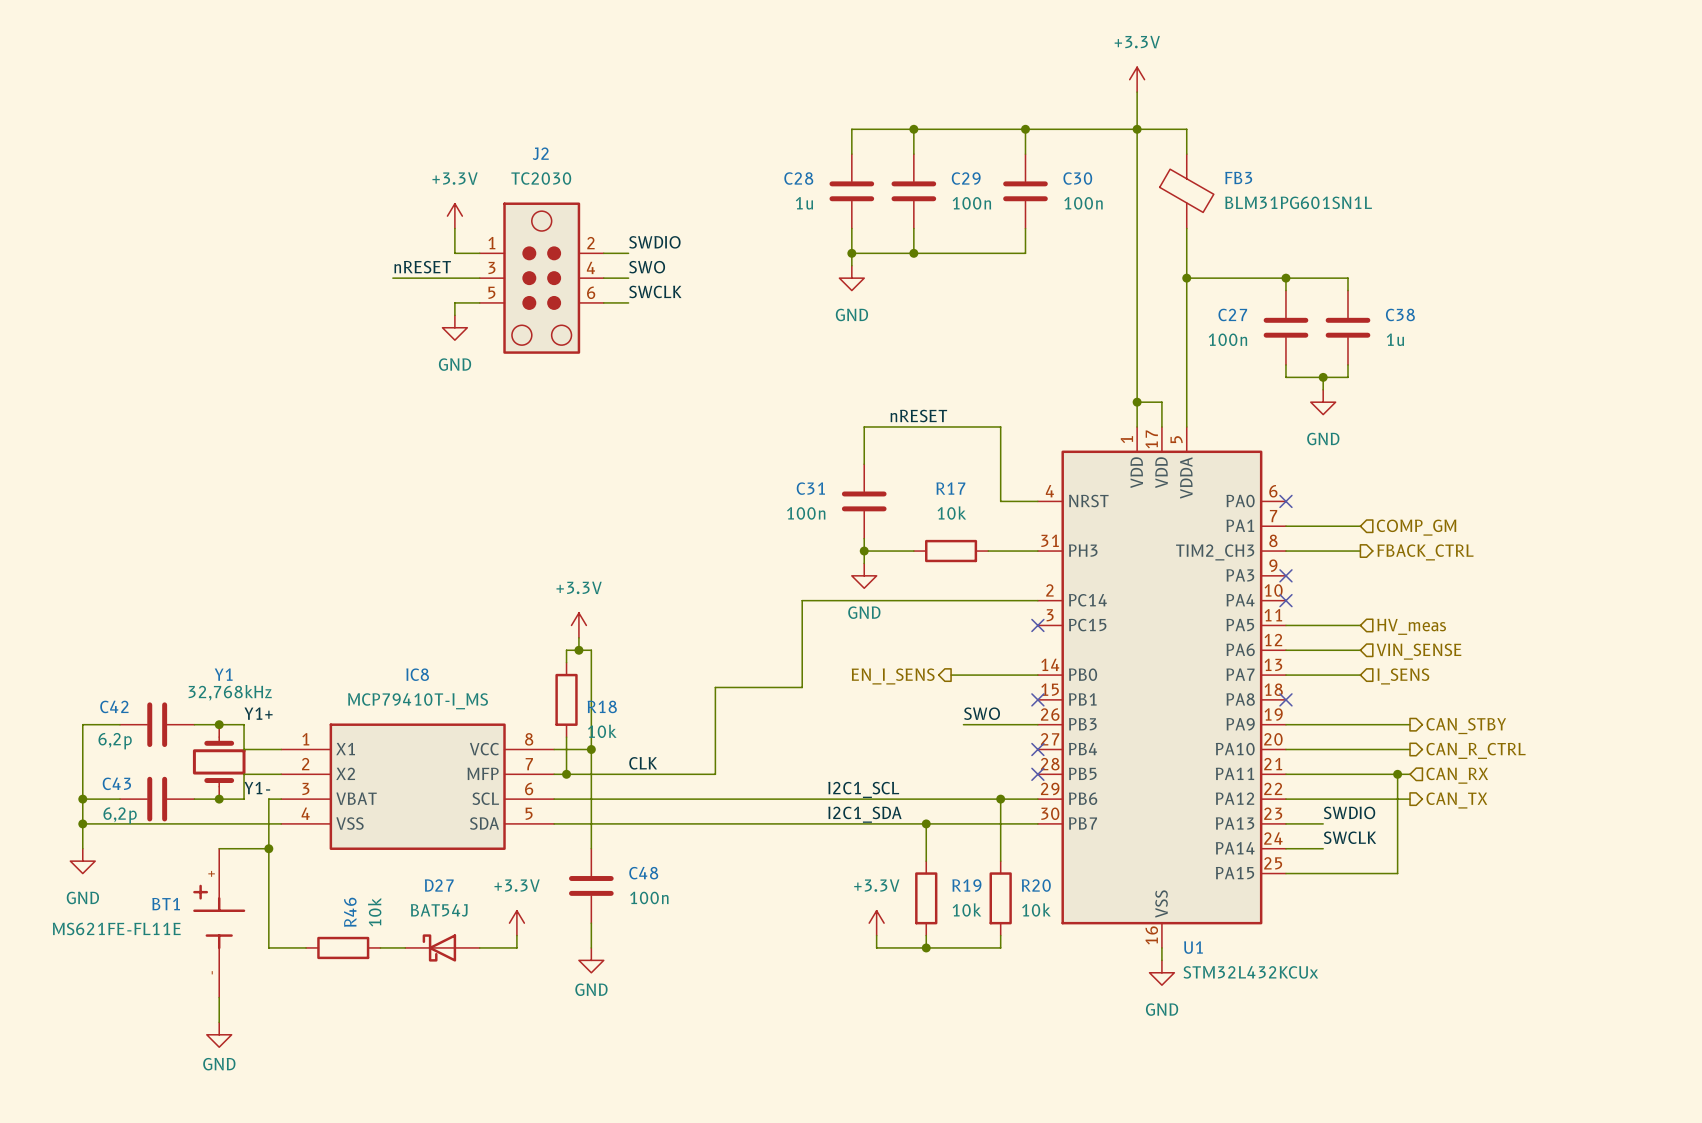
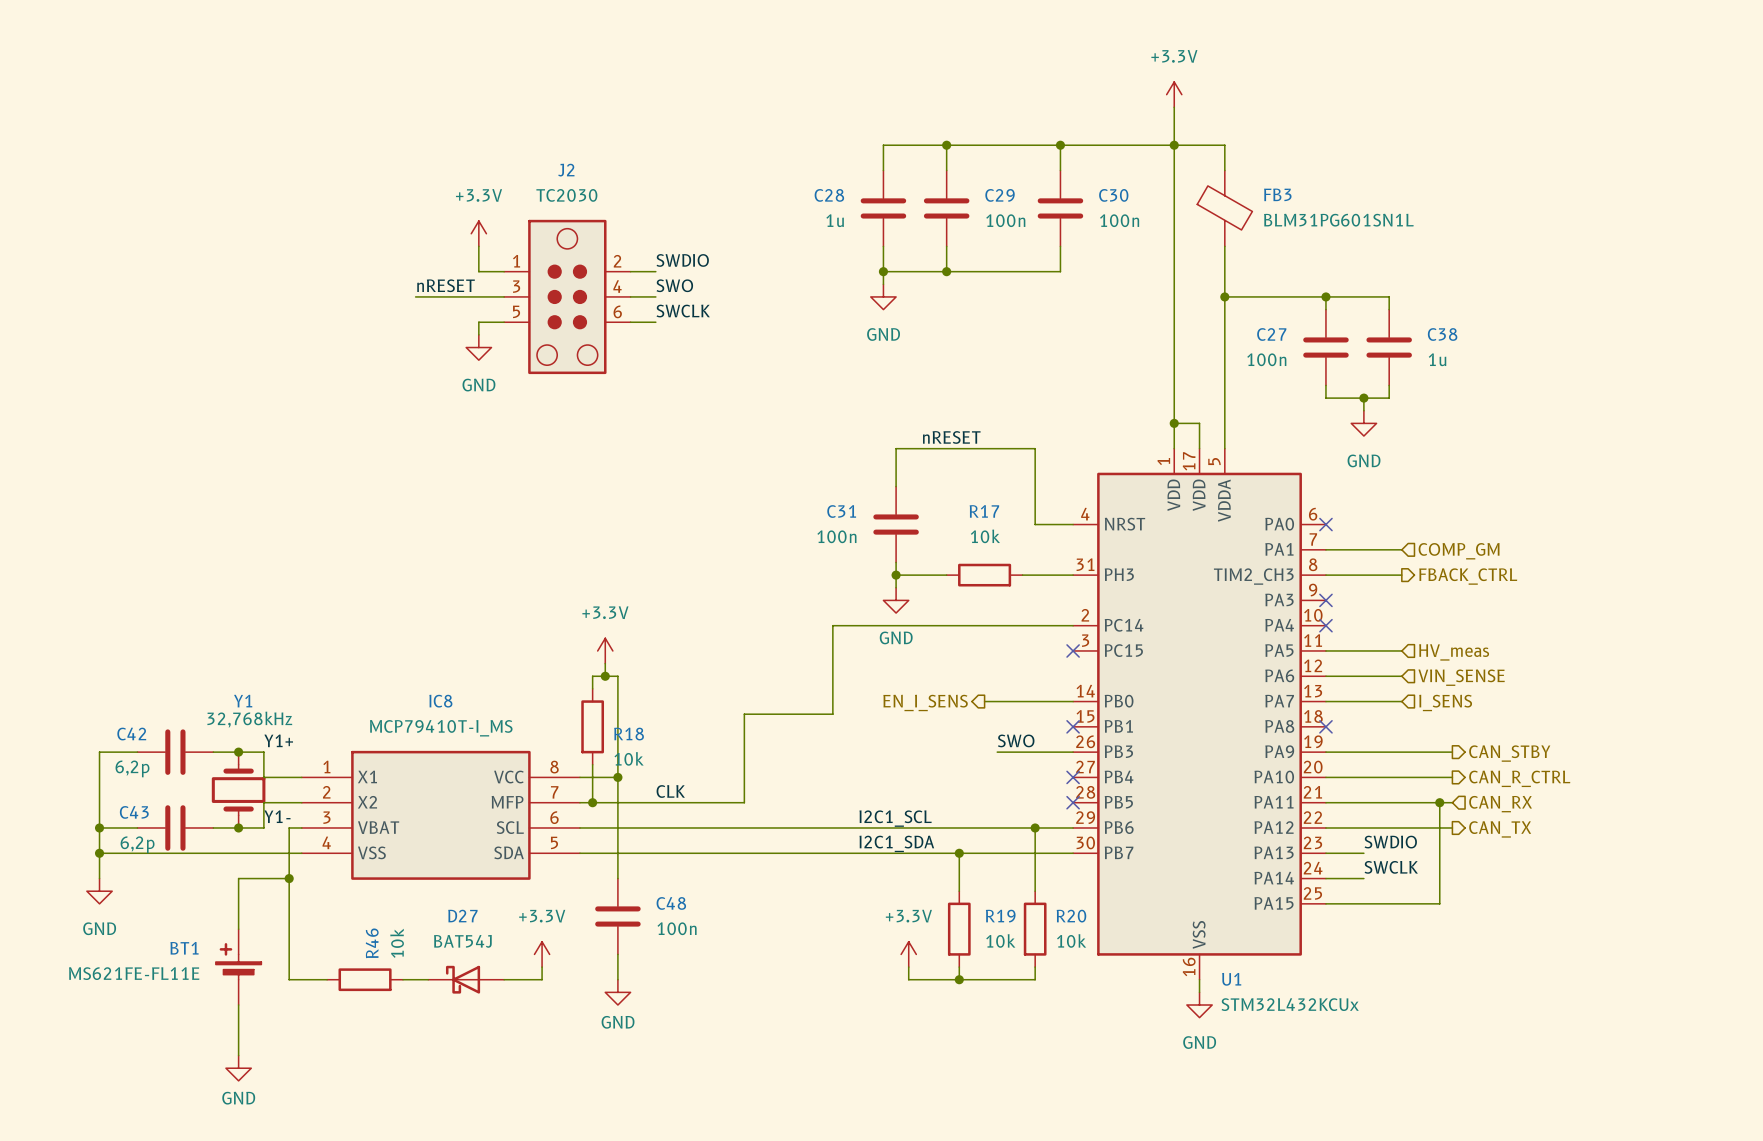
BT1 symbol: [193, 848, 246, 998] -> [215, 929, 262, 1006]

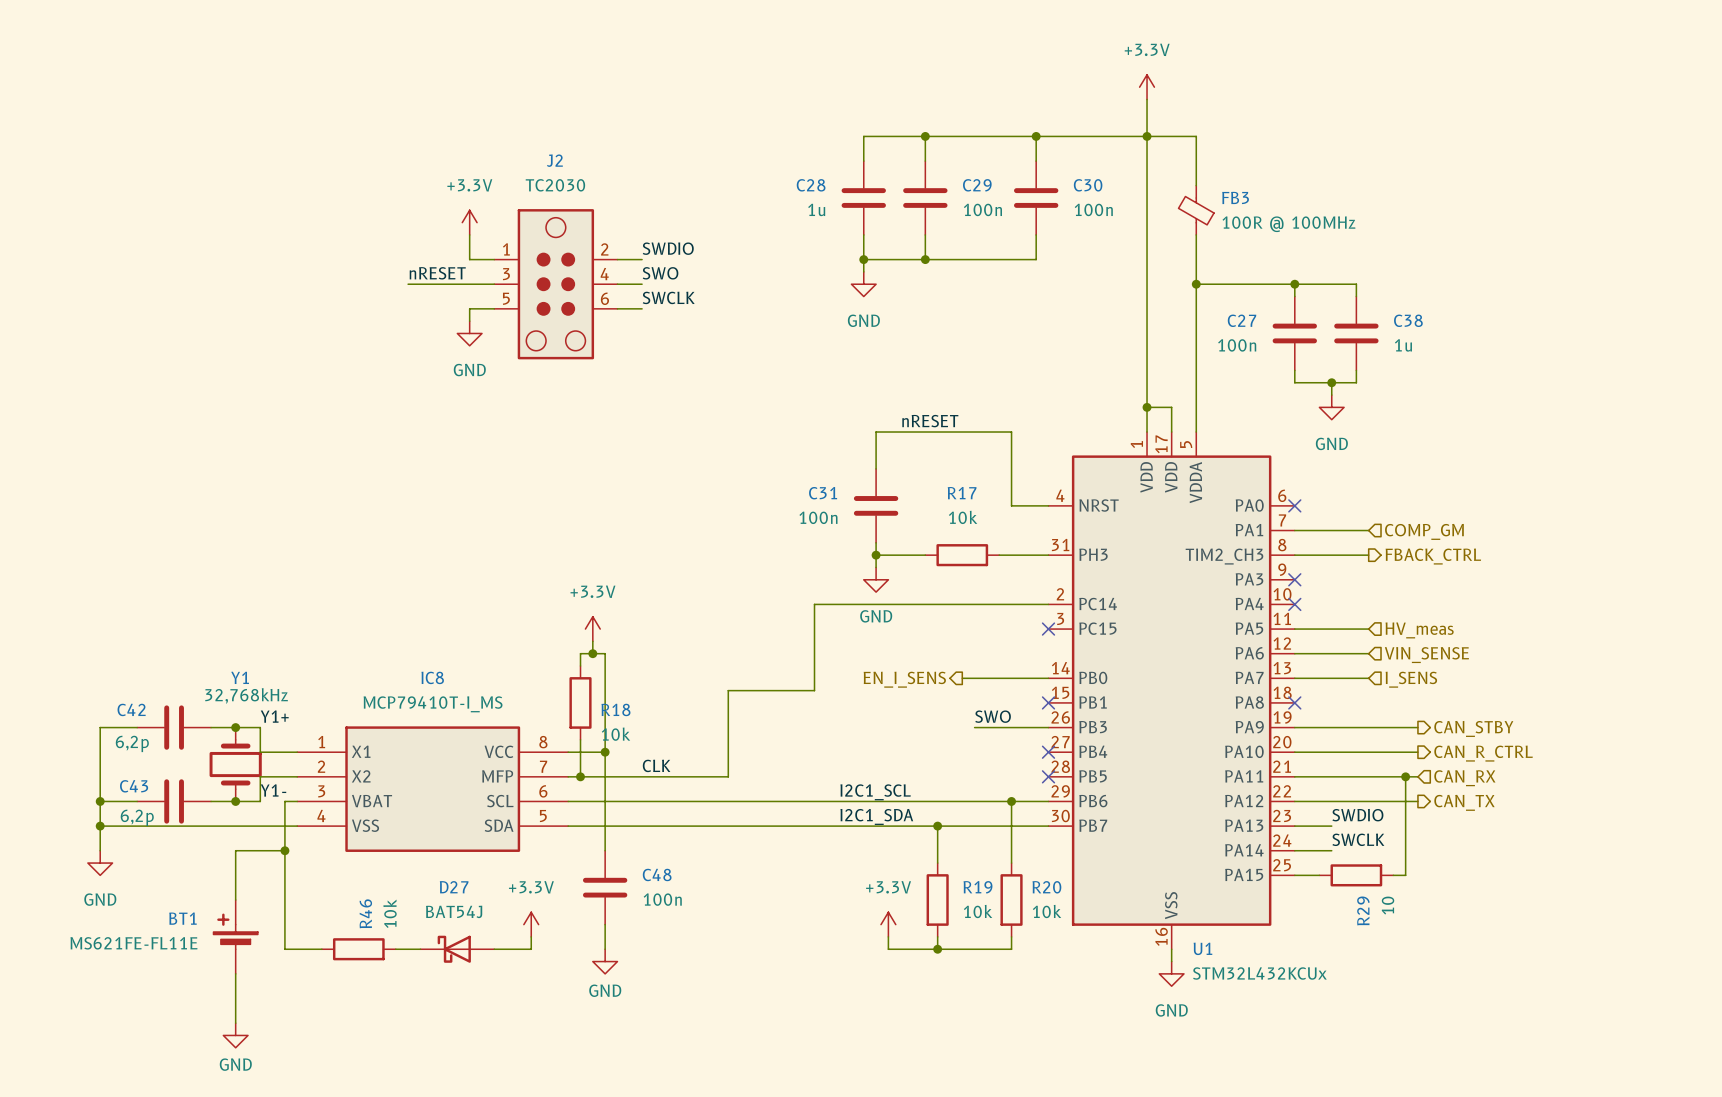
FB3 symbol: [1197, 170, 1253, 247] -> [1178, 185, 1215, 235]
FB3 value: BLM31PG601SN1L (1338, 220) -> 100R @ 100MHz (1288, 224)
wire: (1351, 903) (1427, 903) -> none
R29: none -> 10 (1356, 875)

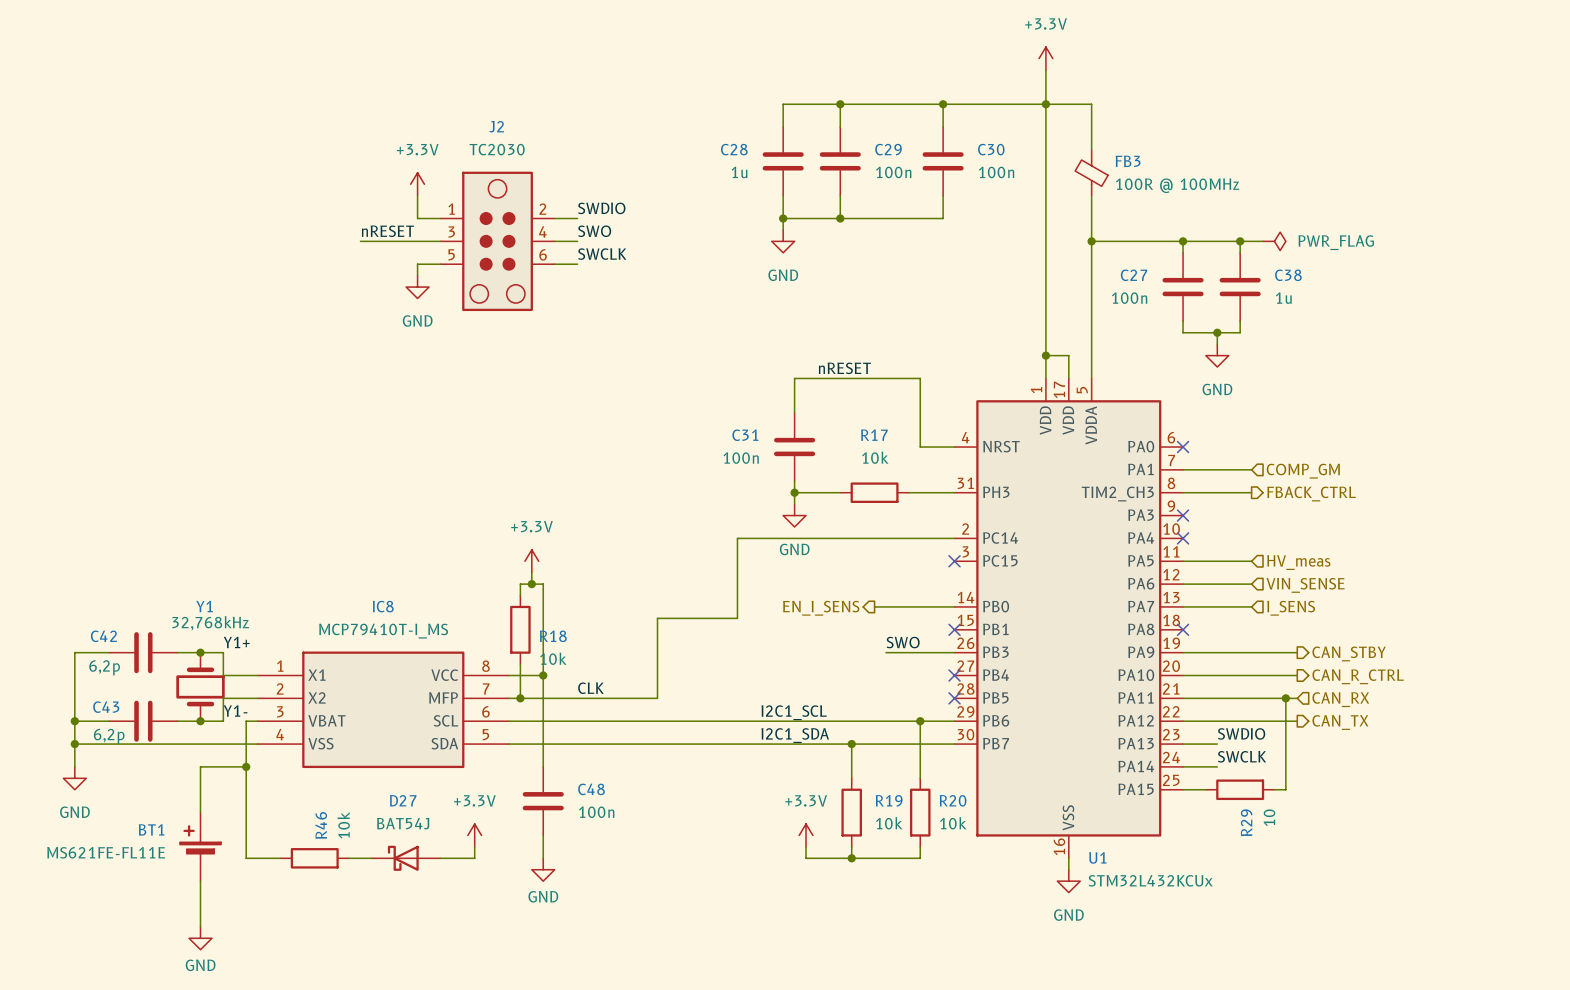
wire: none -> (1240, 241) (1263, 241)
junction: none -> (1240, 241)
power symbol: none -> PWR_FLAG (1274, 241)

